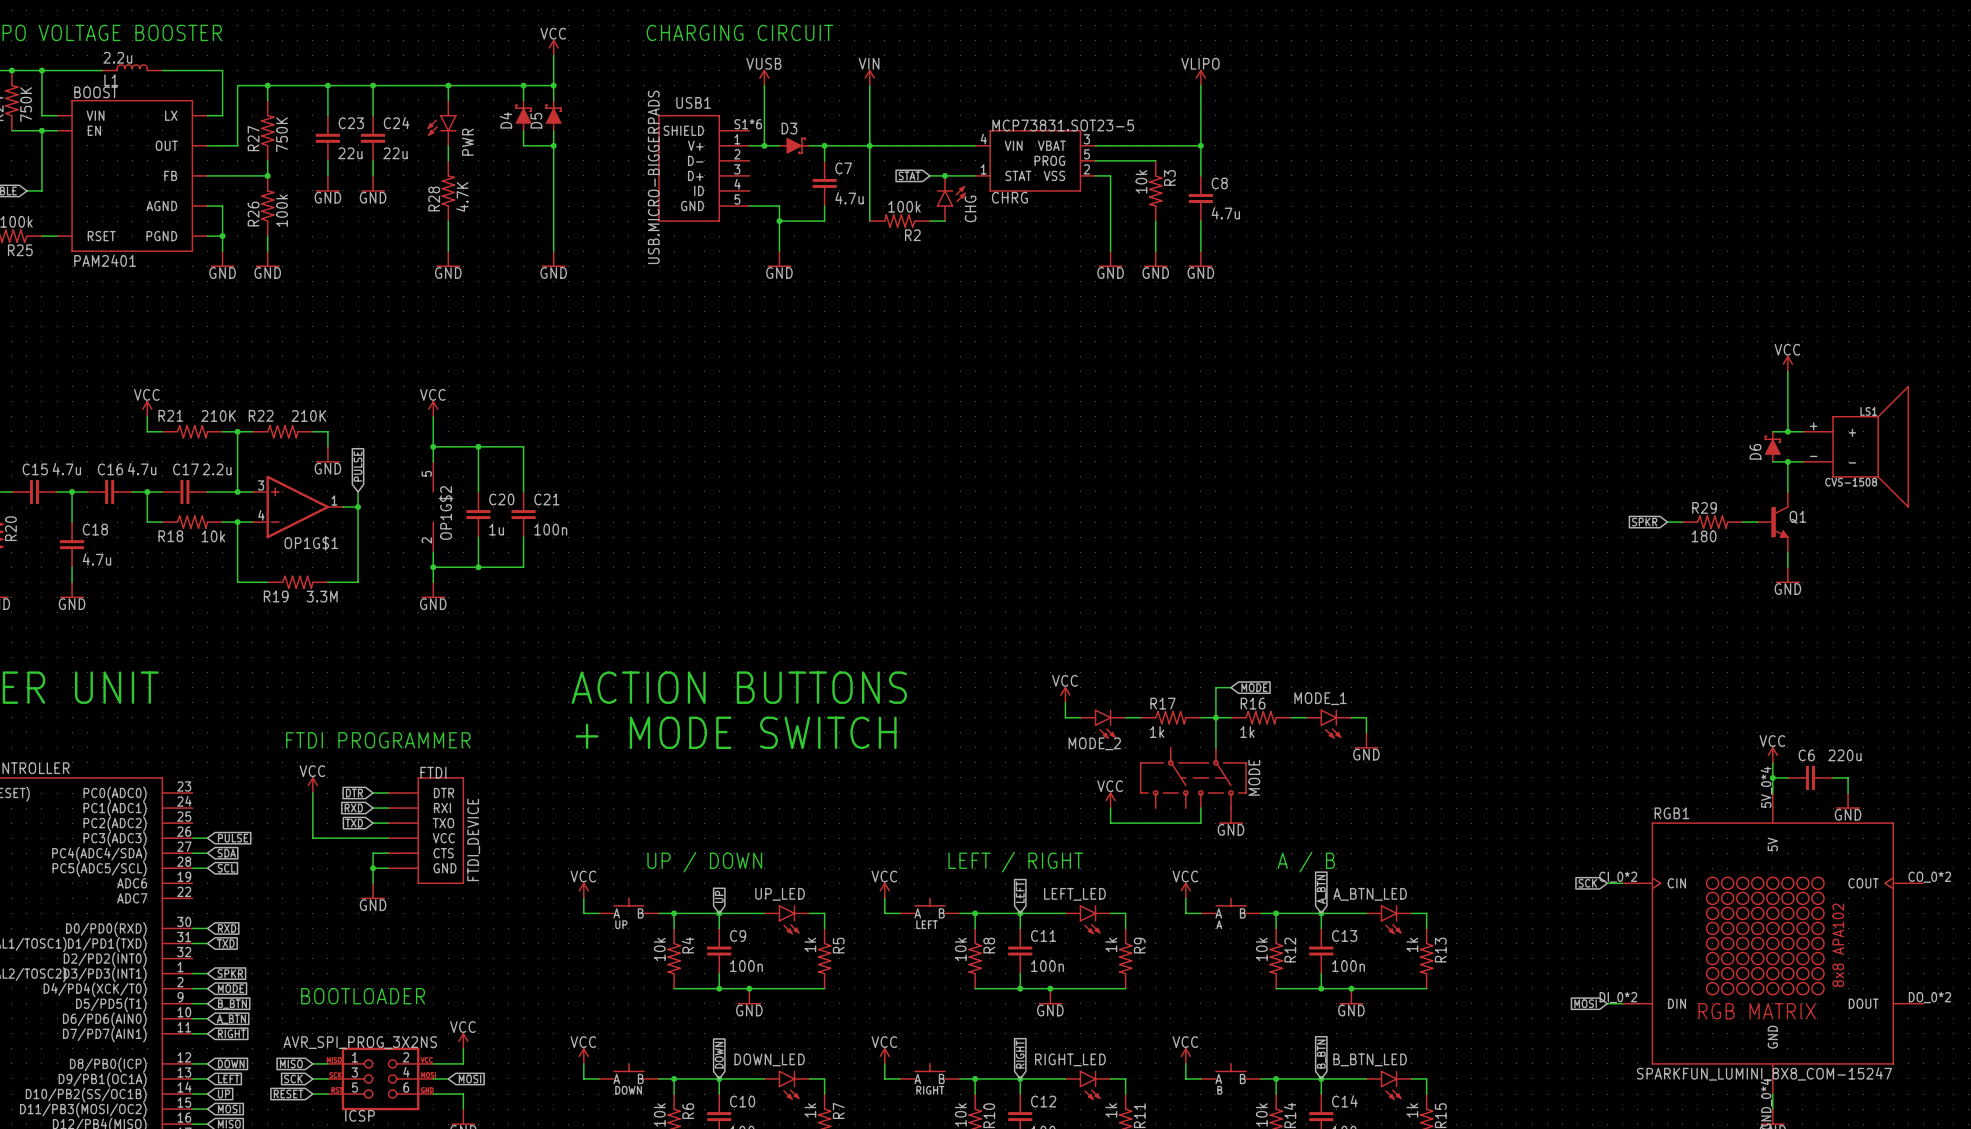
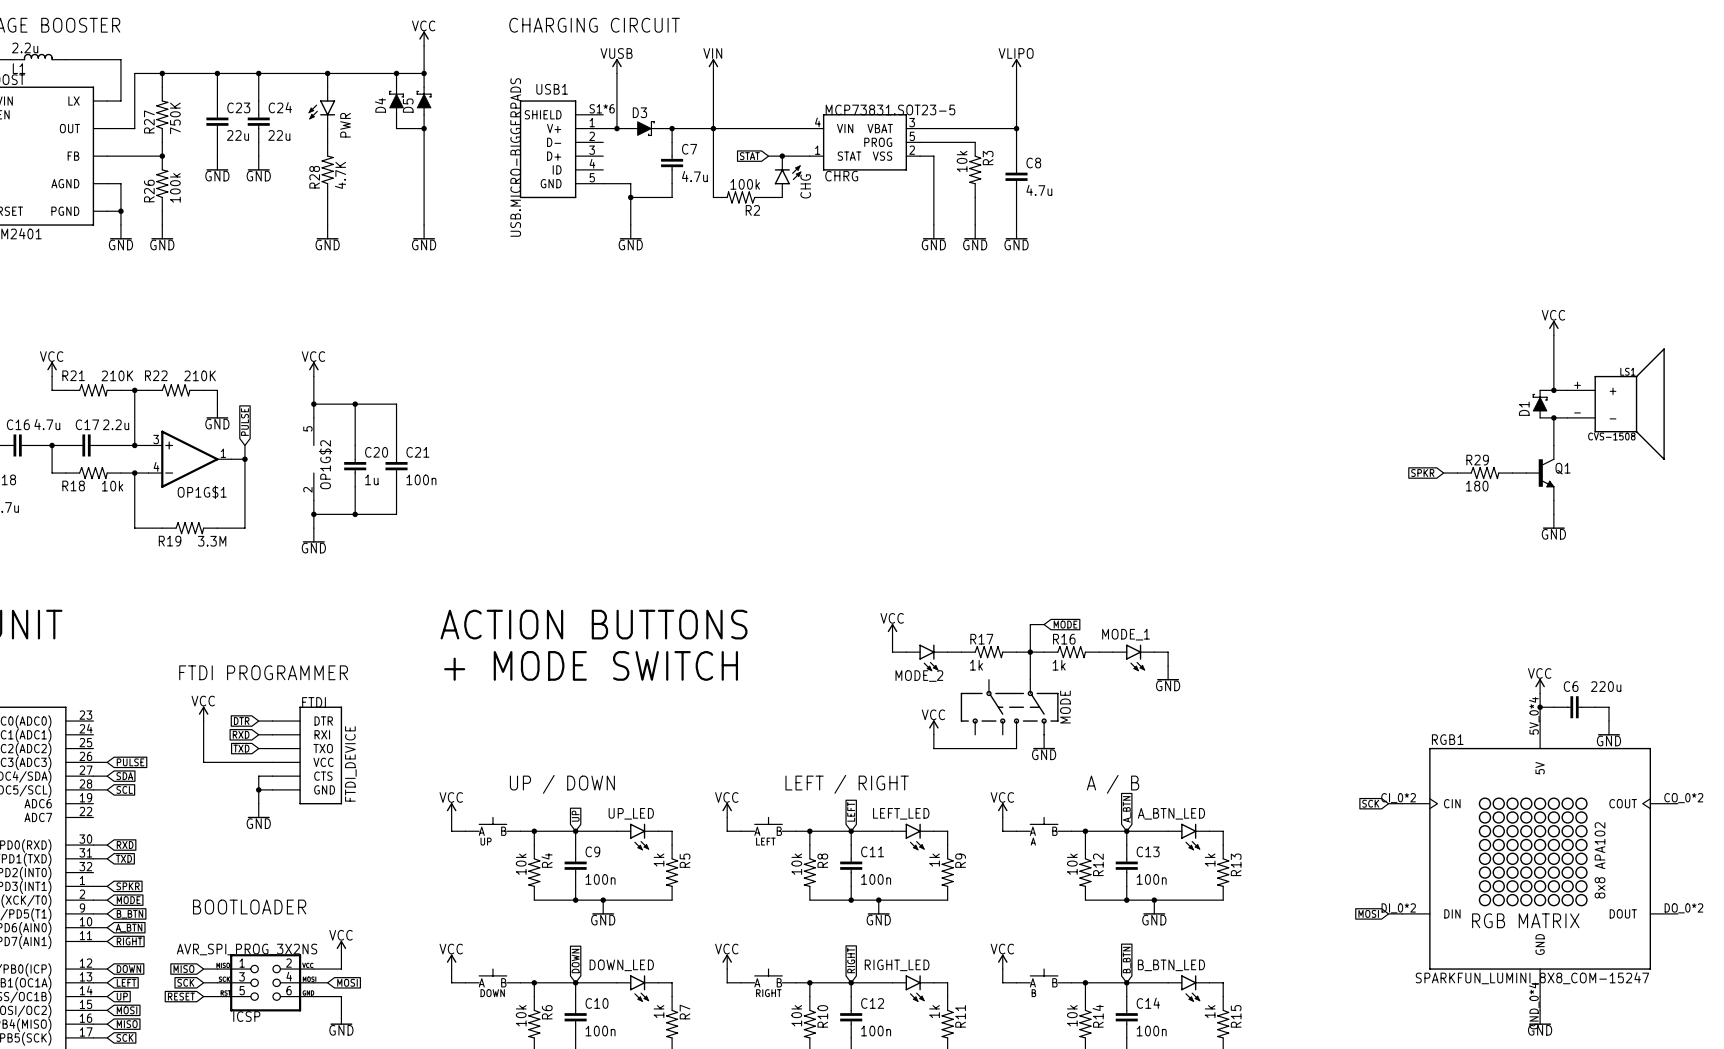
D6 name: D6 (1755, 451) -> D1 (1524, 408)

